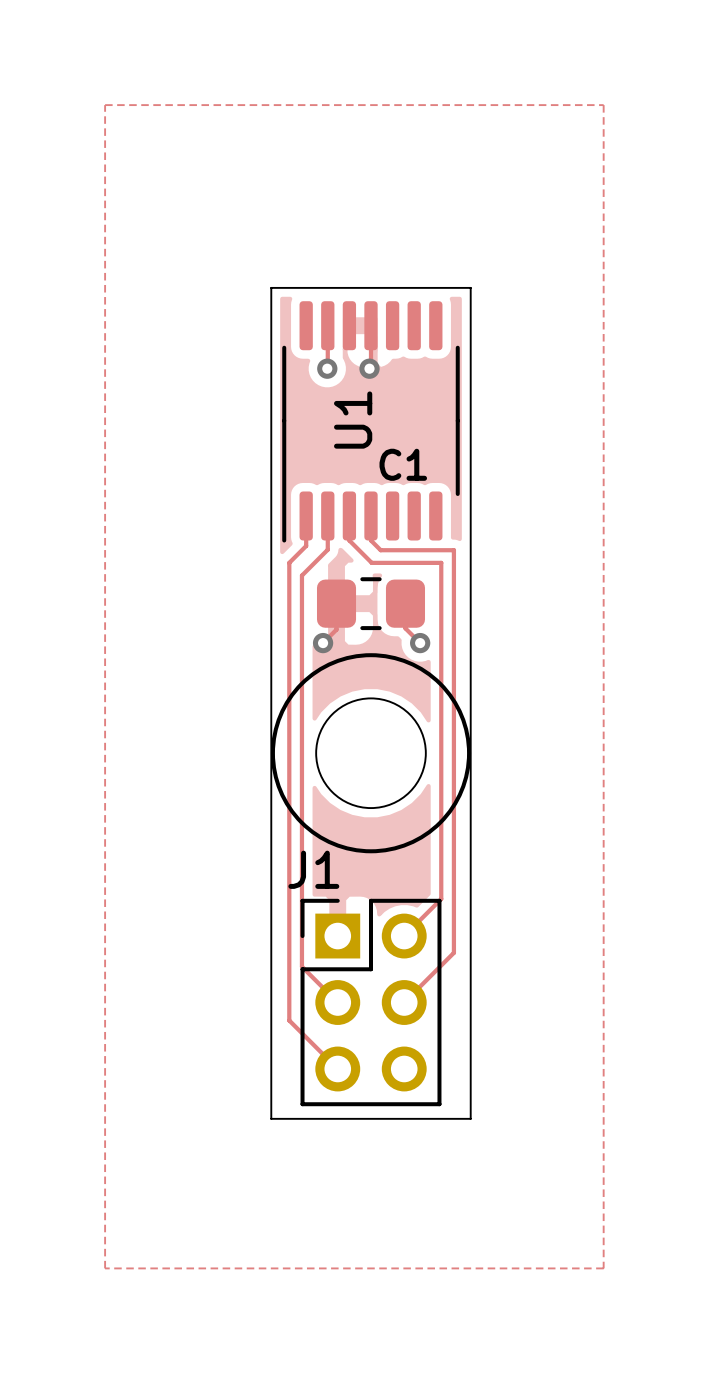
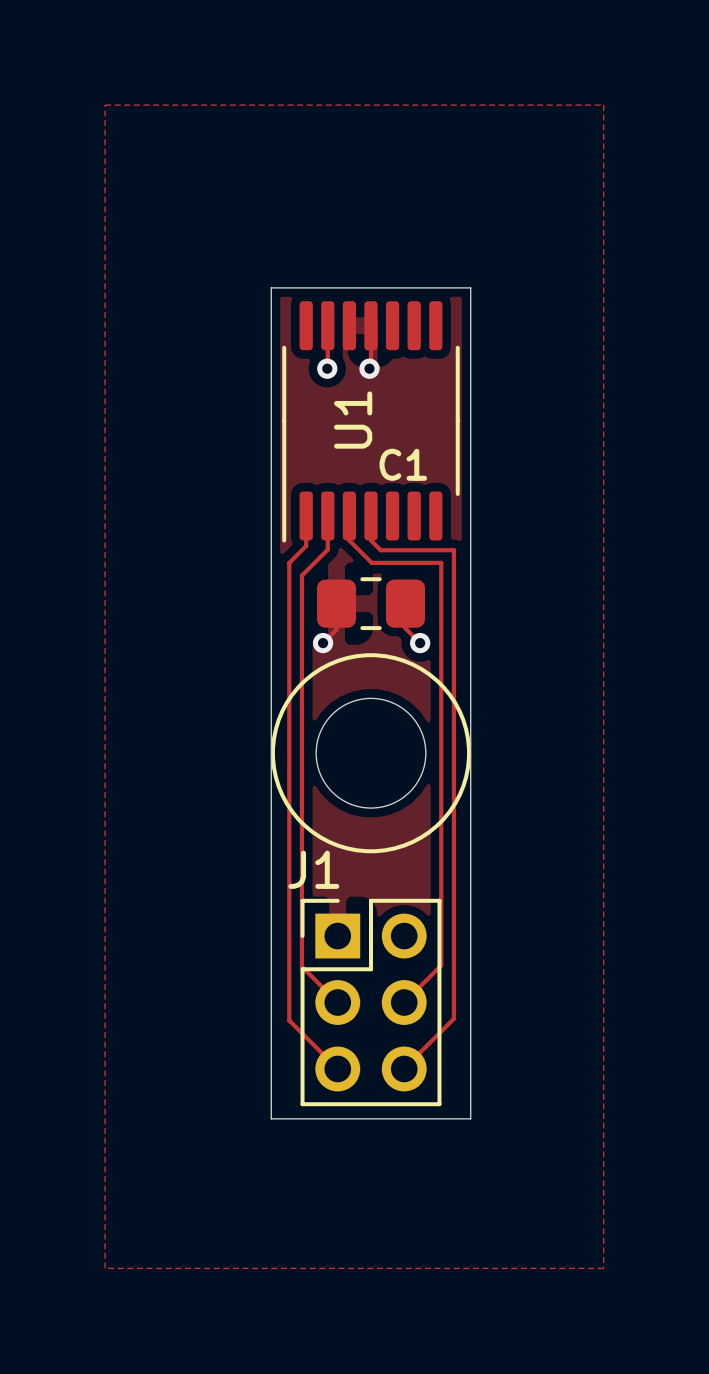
track: (441, 899) (404, 936) -> (441, 899) (441, 965)
track: (453, 952) (441, 965) -> (453, 952) (453, 1018) (404, 1068)

